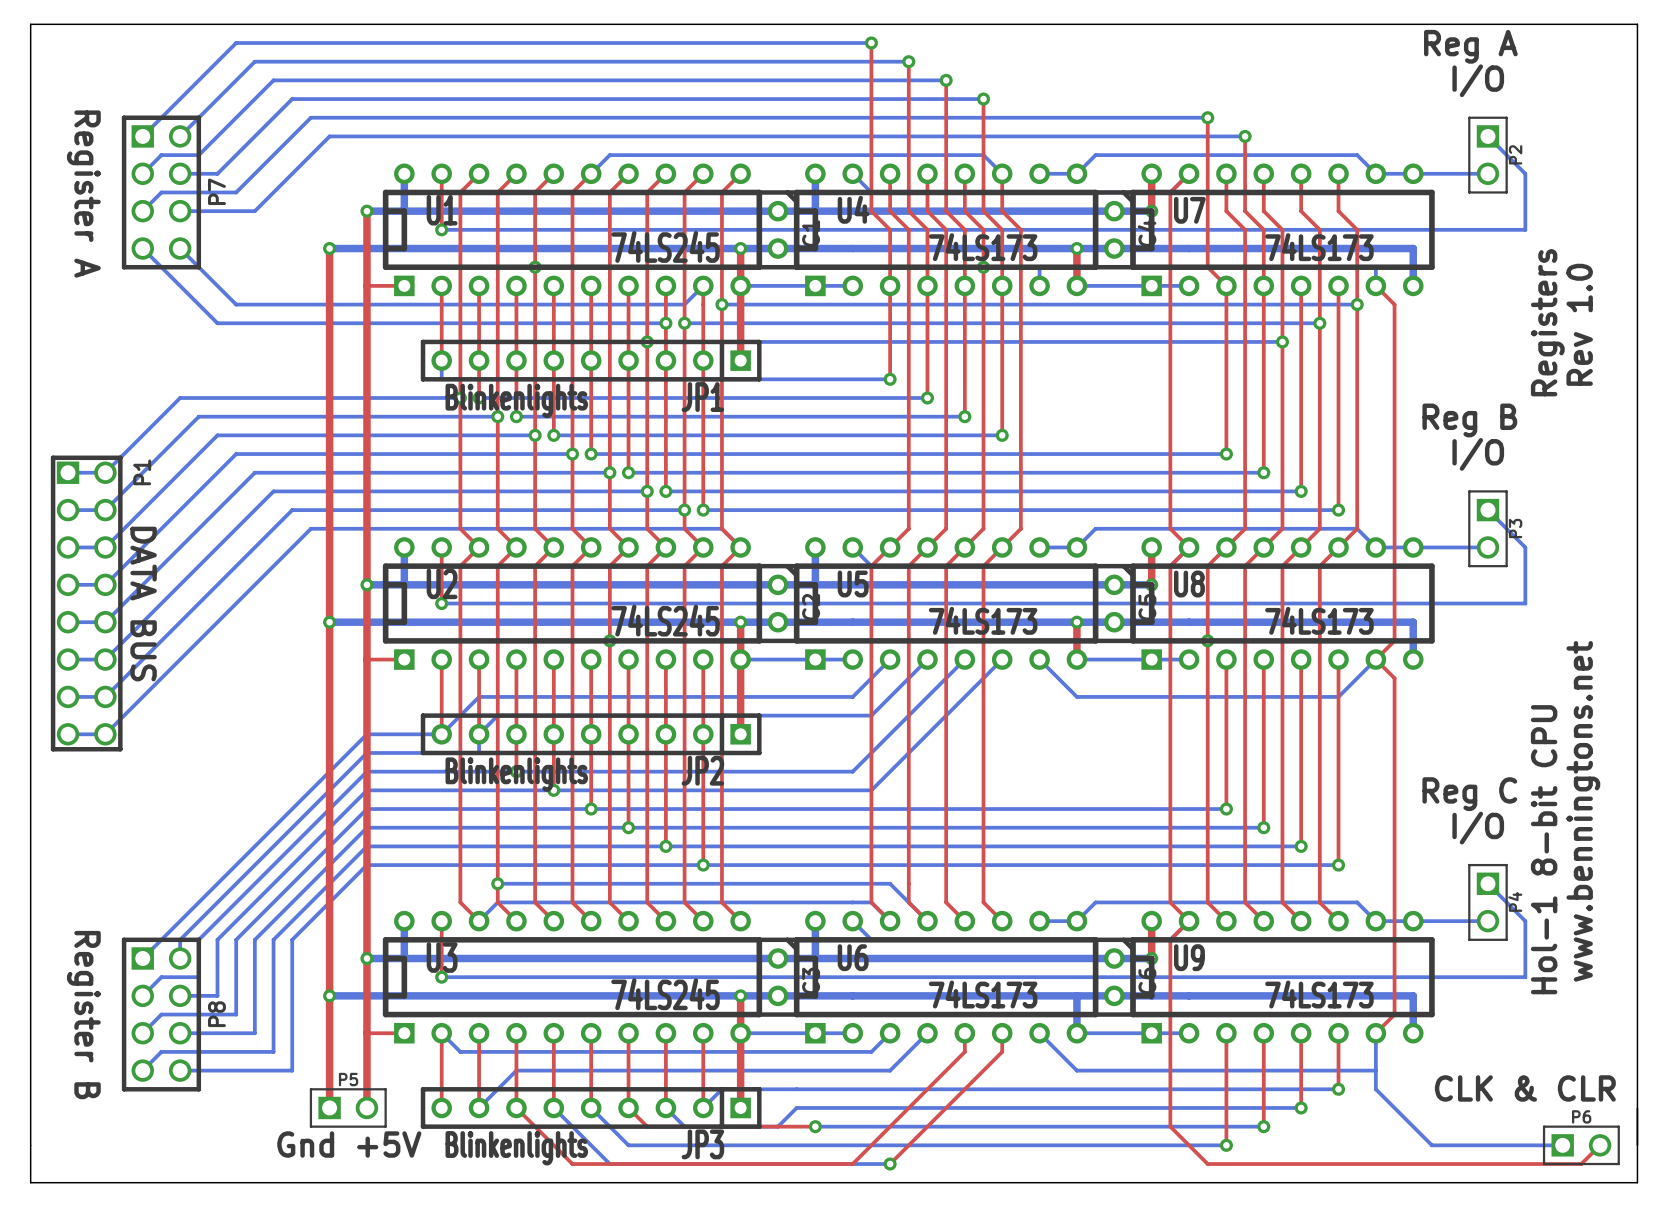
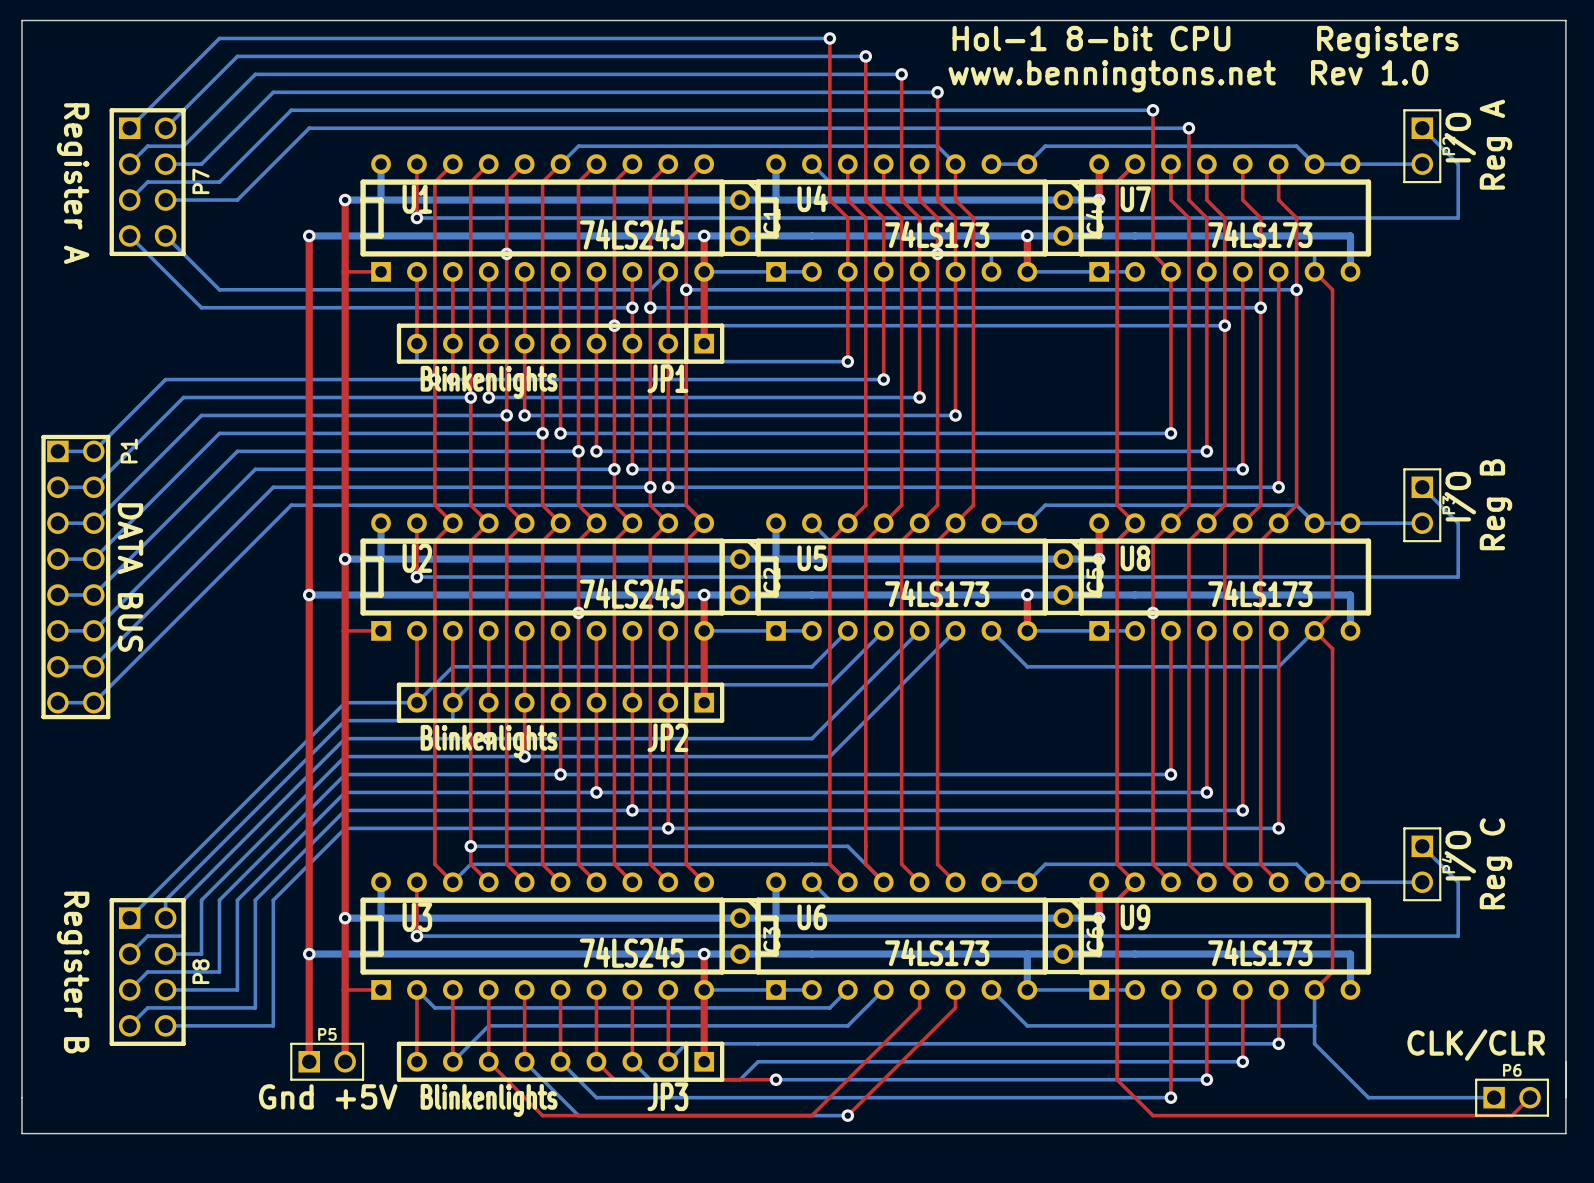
text: none -> Hol-1 8-bit CPU Registers (1205, 42)
text rotation: 0° (1470, 46) -> 90° counterclockwise (1495, 144)
text position: Reg A (1470, 46) -> Reg A (1495, 144)
text rotation: 0° (1478, 80) -> 90° counterclockwise (1460, 137)
text: none -> www.benningtons.net Rev 1.0 (1188, 76)
text rotation: 0° (1469, 420) -> 90° counterclockwise (1495, 504)
text position: Reg B (1469, 420) -> Reg B (1495, 504)
text rotation: 0° (1478, 454) -> 90° counterclockwise (1460, 496)
text: Hol-1 8-bit CPU Registers (1547, 621) -> none
text: www.benningtons.net Rev 1.0 (1583, 622) -> none
text rotation: 0° (1469, 794) -> 90° counterclockwise (1495, 863)
text position: Reg C (1469, 794) -> Reg C (1495, 863)
text rotation: 0° (1478, 828) -> 90° counterclockwise (1460, 855)
text: CLK & CLR (1525, 1088) -> CLK/CLR (1476, 1045)

